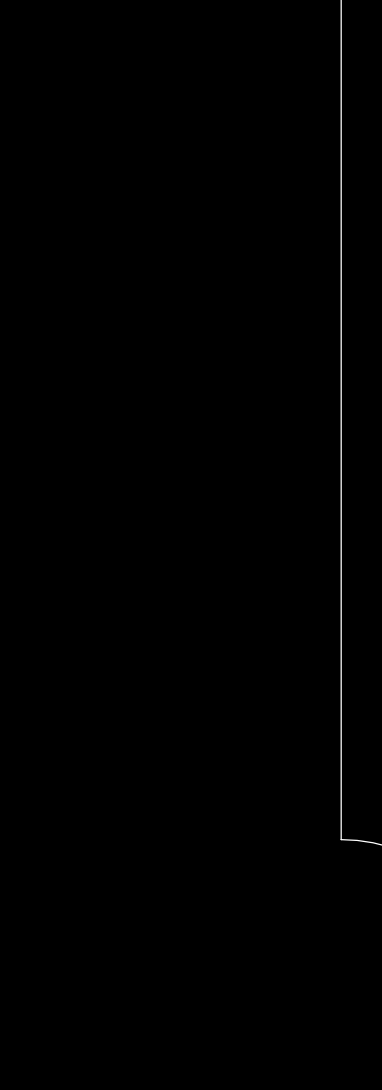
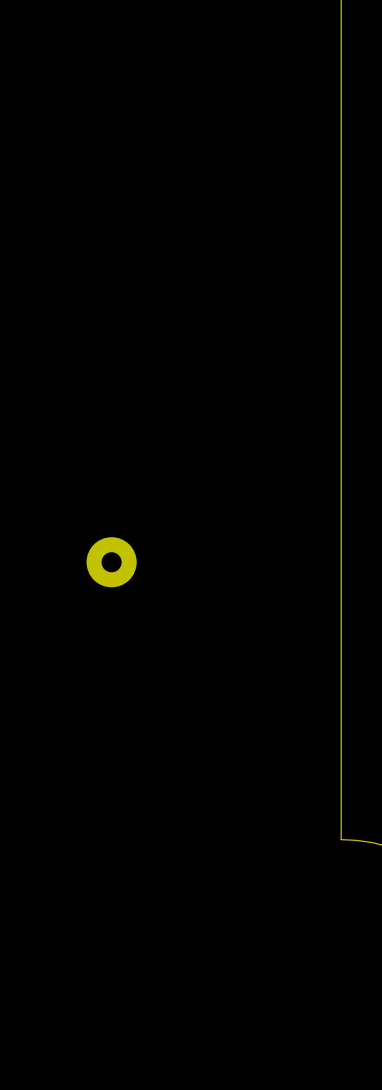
part: none -> (111, 562)

